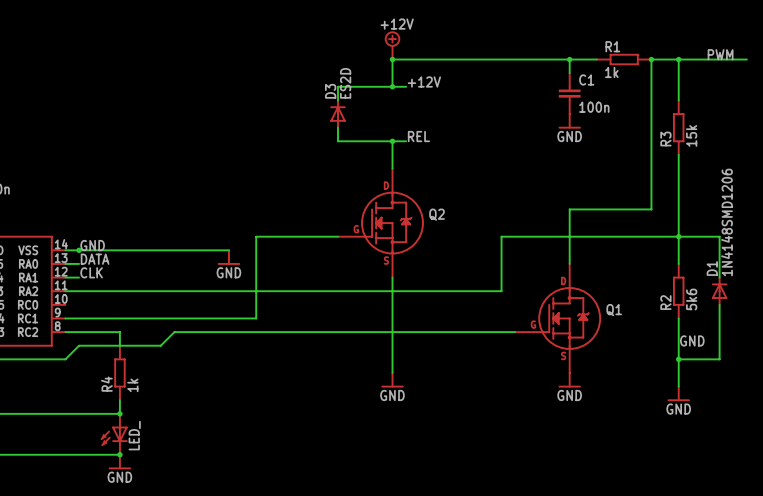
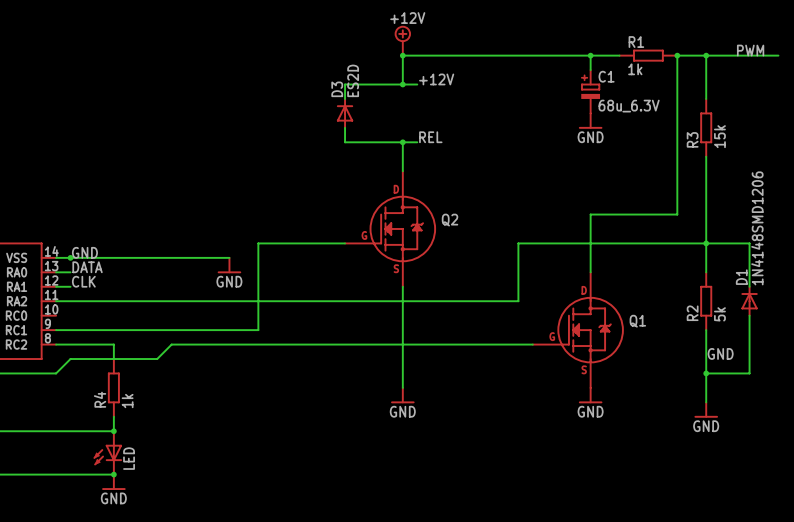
C1 symbol: [558, 73, 581, 115] -> [581, 70, 601, 114]
C1 value: 100n (594, 107) -> 68u_6.3V (629, 106)
R2 value: 5k6 (691, 299) -> 5k (719, 314)
LED_ name: LED_ (134, 435) -> LED (129, 458)

